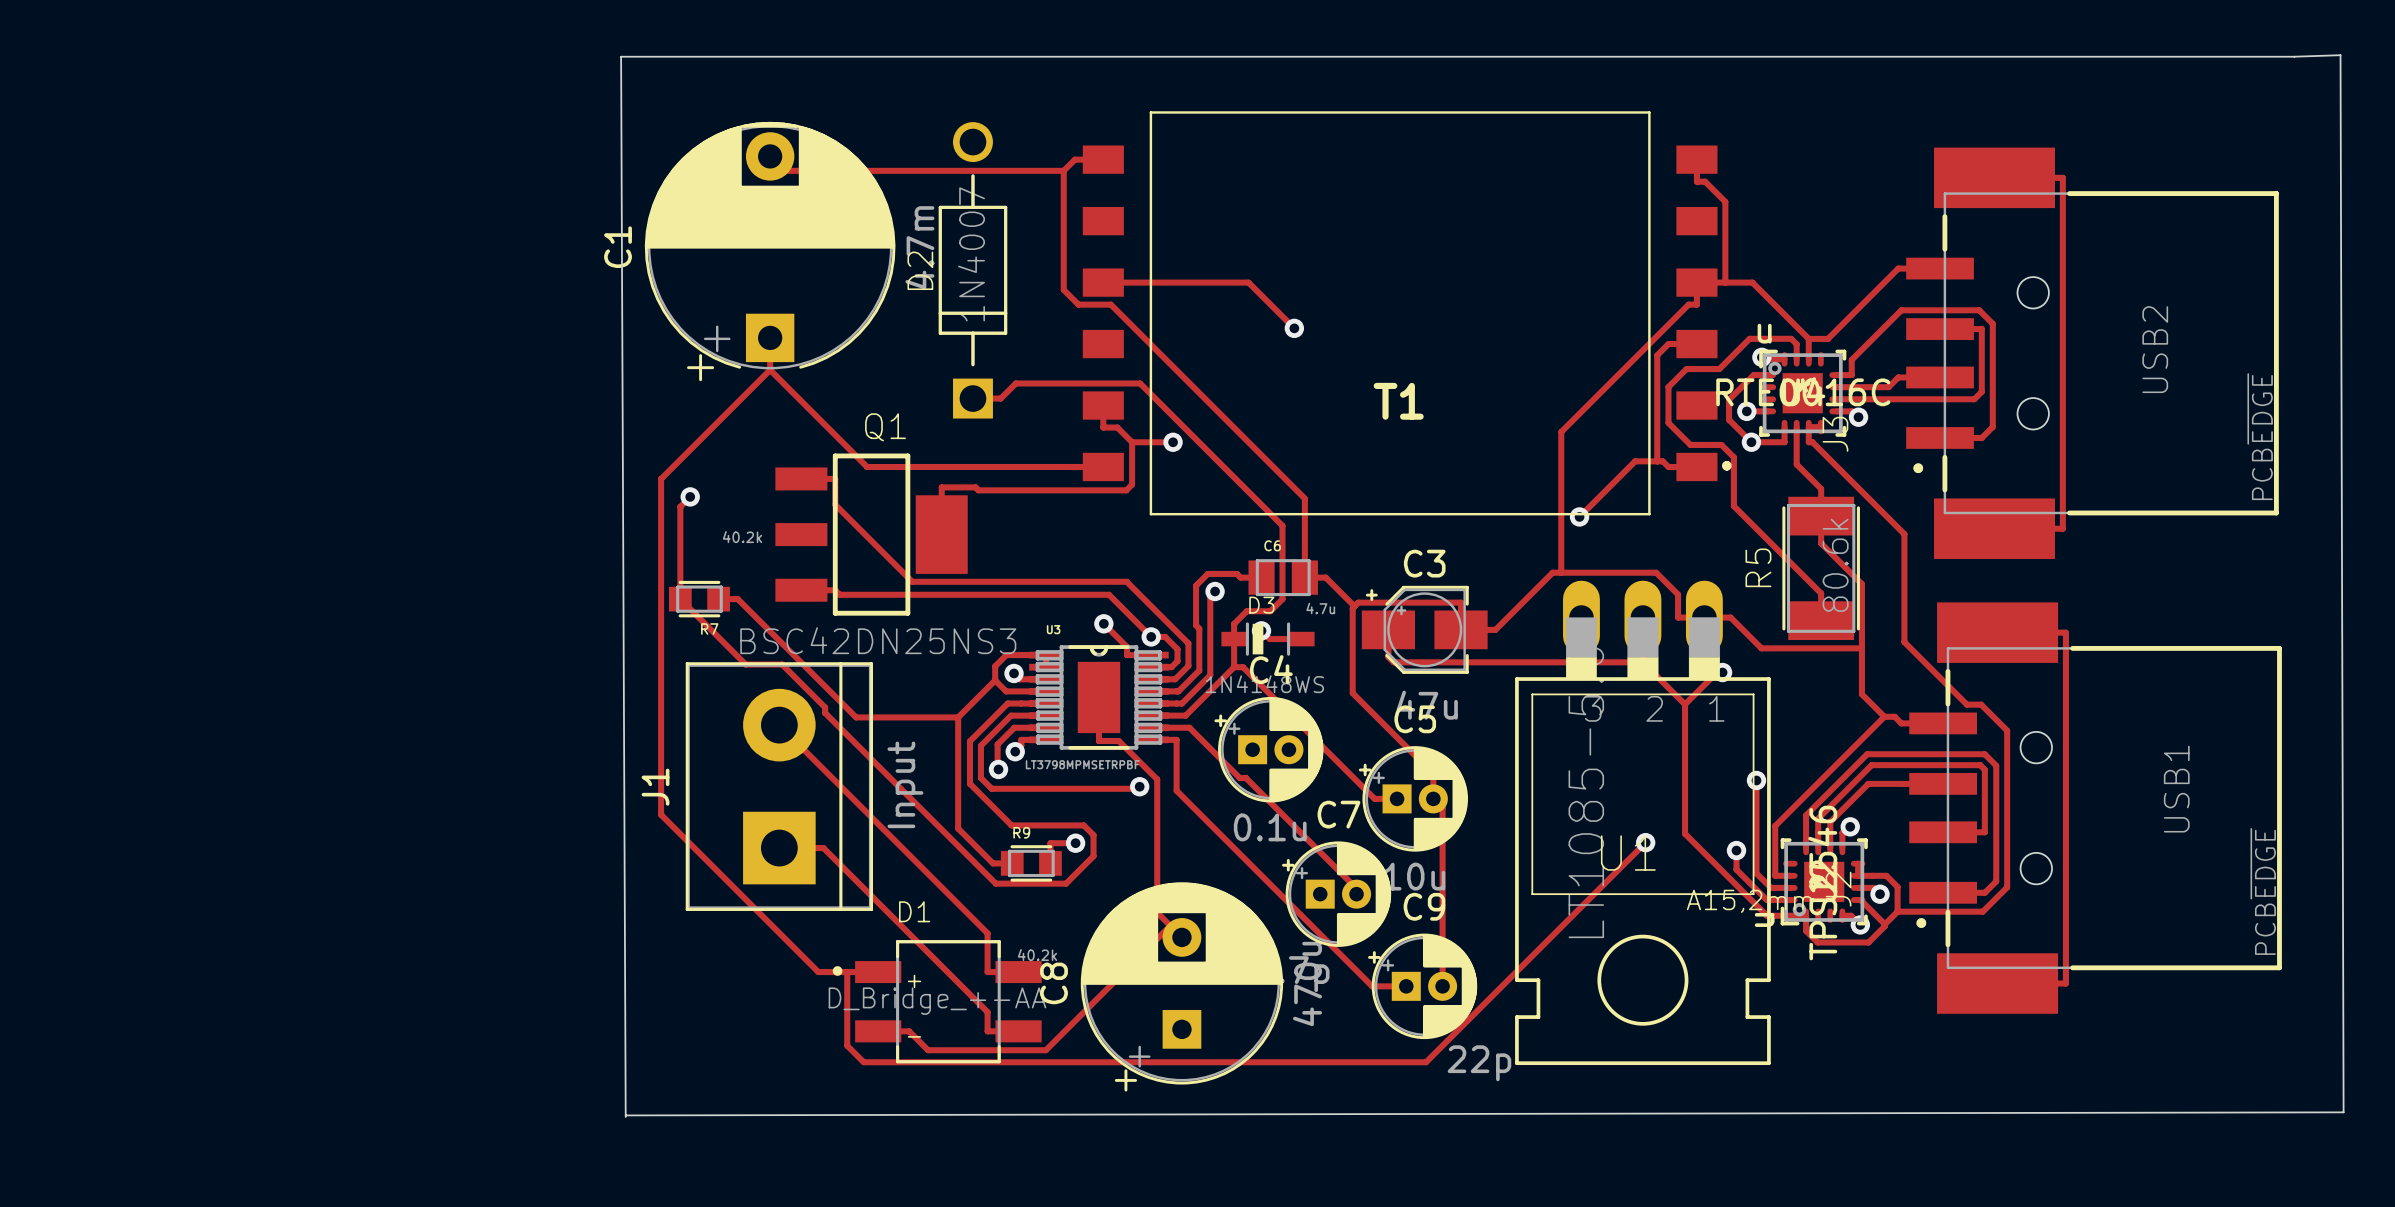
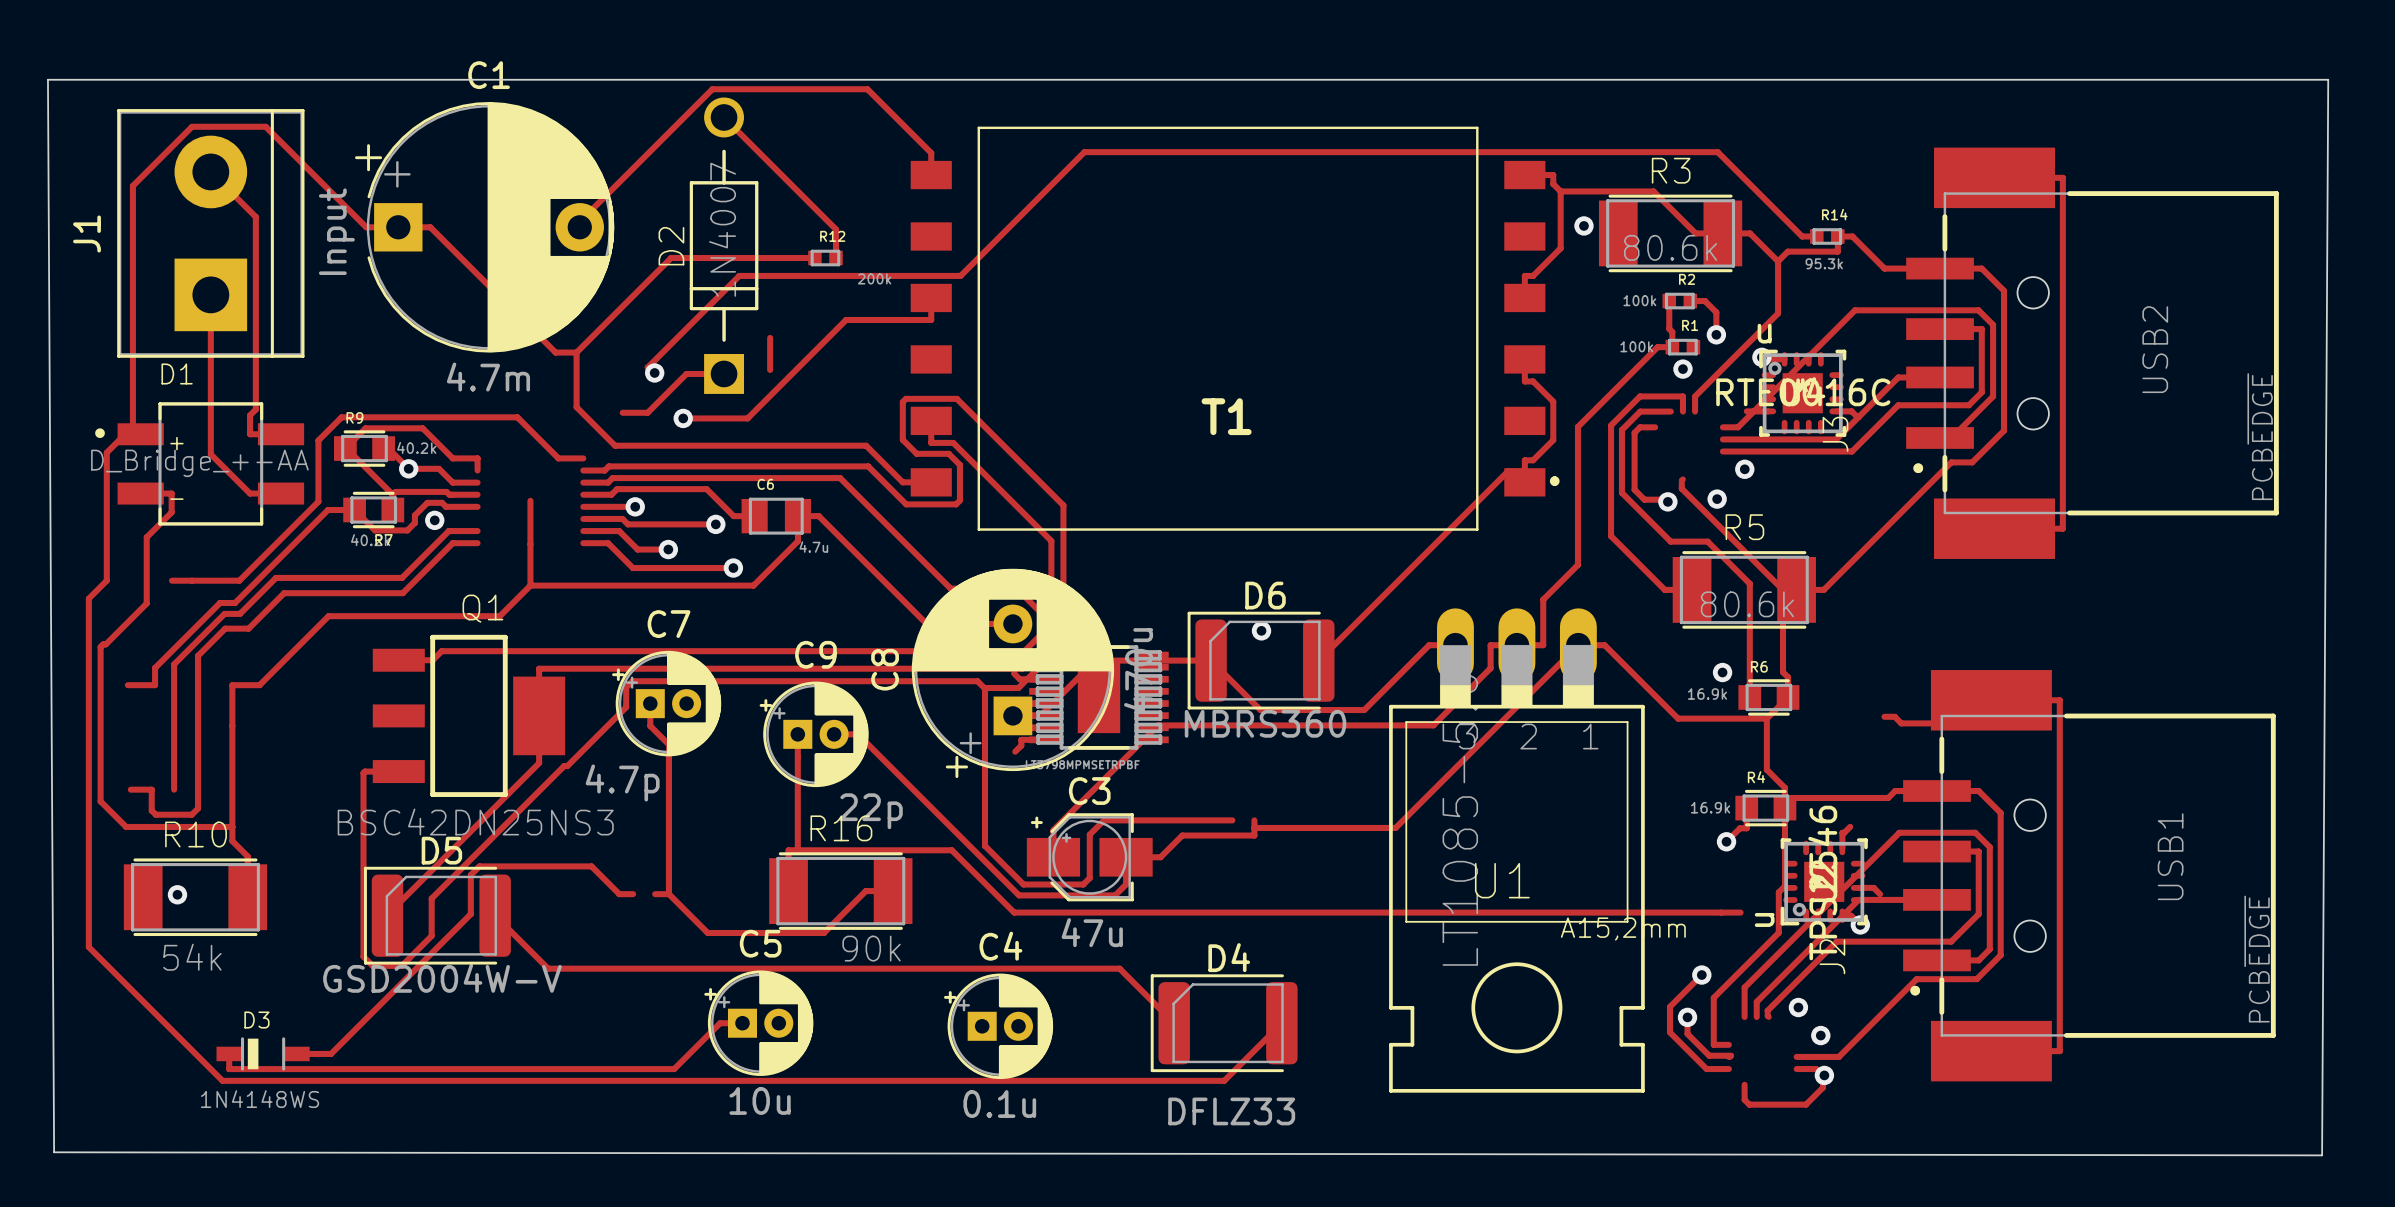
board edge: none -> (47, 79) (54, 1152) (2322, 1155) (2328, 79) (47, 79)
track: none -> (724, 117) (835, 229) (835, 258)
track: (770, 156) (784, 170) (1063, 170) -> none
track: (1103, 159) (1074, 159) (1063, 170) -> none
track: (1696, 159) (1696, 181) (1705, 181) (1725, 201) (1725, 282) -> none
track: (1063, 170) (1063, 289) (1078, 304) (1110, 304) (1304, 498) (1304, 577) (1325, 577) (1354, 606) -> none
track: none -> (210, 171) (255, 216) (255, 409) (250, 415) (250, 434) (281, 434)
track: none -> (931, 175) (931, 153) (867, 89) (712, 89) (579, 221) (579, 227)
track: none -> (1524, 175) (1553, 175) (1553, 184) (1560, 191)
track: none -> (1560, 191) (1560, 248) (1533, 275) (1524, 275) (1524, 297)
track: none -> (1560, 191) (1653, 191) (1695, 233) (1750, 233) (1778, 261)
via: none -> (1583, 225)
R3: none -> 80.6k (1670, 233)
track: none -> (1816, 236) (1802, 236) (1717, 152) (1084, 152) (960, 275) (739, 275) (647, 367) (654, 372)
R14: none -> 95.3k (1827, 236)
C1 rotation: 0° (770, 251) -> 90° clockwise (484, 227)
C1 position: (770, 251) -> (484, 227)
track: none -> (814, 258) (671, 258) (576, 352)
R12: none -> 200k (825, 258)
track: none -> (1778, 261) (1778, 313) (1695, 396) (1695, 411)
track: (1898, 268) (1827, 338) (1808, 338) -> (1898, 268) (1884, 268) (1852, 236) (1837, 236) (1837, 251) (1787, 251) (1778, 261)
track: none -> (1940, 268) (1981, 268) (2003, 290) (2003, 430) (1972, 462) (1951, 462) (1823, 589) (1782, 589)
D2 position: (972, 270) -> (724, 245)
track: (1103, 282) (1248, 282) (1294, 328) -> none
track: none -> (210, 294) (210, 454) (250, 493) (281, 493)
track: none -> (931, 297) (931, 319) (846, 319) (747, 418) (683, 418)
track: none -> (1669, 301) (1669, 328) (1672, 332) (1672, 347) (1657, 347) (1577, 426) (1577, 564) (1543, 599) (1543, 645) (1490, 645) (1490, 668) (1433, 725) (1158, 725) (1053, 830) (1053, 857)
R2: none -> 100k (1679, 301)
track: none -> (1690, 301) (1704, 301) (1716, 312) (1716, 334)
track: (1901, 310) (1851, 359) (1851, 375) (1836, 375) -> (1901, 310) (1855, 310) (1738, 427) (1722, 427)
track: (1978, 310) (1992, 323) (1992, 426) (1981, 437) (1951, 437) -> (1978, 310) (1993, 324) (1993, 396) (1951, 437)
T1 position: (1407, 313) -> (1235, 328)
via: (1294, 328) -> none
via: none -> (1716, 334)
track: (1808, 338) (1752, 282) (1696, 282) (1696, 304) (1688, 304) (1561, 432) (1561, 572) -> none
track: (1808, 338) (1808, 359) -> none
track: (1696, 344) (1668, 344) (1657, 355) (1657, 461) -> none
R1: none -> 100k (1682, 347)
track: none -> (576, 352) (576, 407) (615, 445) (866, 445) (902, 482) (931, 482)
track: none -> (576, 352) (555, 352) (430, 227) (366, 227) (265, 126) (192, 126) (132, 185) (132, 434)
track: none -> (1524, 359) (1524, 381) (1533, 381) (1553, 401) (1553, 440) (1533, 460) (1524, 460) (1524, 482)
track: (1796, 359) (1796, 344) (1791, 338) (1749, 338) (1719, 369) (1686, 369) (1668, 387) (1668, 422) (1690, 444) (1721, 444) (1733, 457) (1733, 506) (1821, 593) (1821, 620) -> none
via: none -> (1682, 369)
via: none -> (654, 372)
track: none -> (724, 373) (686, 373) (647, 412) (622, 412)
track: (1768, 375) (1753, 375) (1729, 399) (1729, 419) (1751, 442) (1784, 442) (1784, 427) -> none
track: (1836, 387) (1888, 387) -> (1722, 439) (1836, 439) (1888, 387)
track: (1981, 391) (1974, 399) (1836, 399) -> (1981, 391) (1968, 405) (1898, 405) (1852, 451) (1722, 451)
track: (972, 398) (1000, 398) (1015, 383) (1140, 383) (1282, 525) (1282, 599) (1270, 611) (1246, 611) (1234, 623) (1234, 667) -> none
track: (1103, 405) (1103, 427) (1117, 427) (1132, 442) -> none
track: none -> (1670, 411) (1640, 411) (1621, 429) (1621, 492) (1670, 541) (1707, 541) (1749, 583) (1749, 697)
track: none -> (1682, 411) (1682, 396) (1640, 396) (1611, 425) (1611, 536) (1664, 589) (1692, 589)
via: (1746, 411) -> none
via: (1858, 417) -> none
via: none -> (683, 418)
track: none -> (931, 420) (931, 442) (953, 442) (1051, 540) (1051, 639) (1022, 668) (539, 668) (539, 763) (387, 915)
track: none -> (1655, 427) (1640, 427) (1634, 432) (1634, 489) (1644, 499) (1665, 499) (1667, 501)
track: (1796, 427) (1796, 464) (1821, 488) (1821, 543) (1861, 584) (1861, 694) (1884, 716) (1775, 826) (1775, 875) (1790, 875) -> none
track: (1820, 427) (1808, 427) (1808, 442) (1812, 442) (1904, 534) (1904, 642) (1966, 704) (1981, 704) (2007, 730) (2007, 887) (1982, 911) (1897, 911) -> none
track: none -> (140, 434) (125, 434) (106, 452) (106, 580) (88, 598) (88, 947) (222, 1080) (1224, 1080) (1281, 1023)
track: (1132, 442) (1173, 442) -> none
track: (1132, 442) (1132, 484) (1126, 490) (978, 490) (975, 487) (941, 487) (941, 534) -> none
via: (1173, 442) -> none
via position: (1751, 442) -> (1744, 469)
track: none -> (383, 448) (388, 448) (408, 468) (439, 468) (452, 482) (477, 482)
track: none -> (583, 458) (558, 458) (517, 417) (341, 417) (318, 440) (318, 501) (239, 580) (172, 580)
track: (1103, 466) (867, 466) (770, 369) (661, 479) (661, 814) (818, 972) (878, 972) -> none
track: (1696, 466) (1668, 466) (1662, 461) (1635, 461) (1579, 516) -> none
via: none -> (408, 468)
track: none -> (477, 470) (477, 458) (452, 458) (422, 428) (365, 428) (345, 448) (392, 494)
track: none -> (583, 470) (604, 470) (608, 466) (868, 466) (906, 504) (956, 504) (959, 500) (959, 464) (948, 453) (916, 453) (902, 439) (902, 401) (905, 398) (956, 398) (1063, 505) (1063, 643) (1018, 688) (985, 688)
track: none -> (1524, 471) (1508, 471) (1318, 660)
track: (801, 478) (835, 478) (835, 504) (912, 581) (1126, 581) (1188, 643) (1188, 666) (1175, 679) (1151, 679) -> none
track: none -> (1682, 479) (1681, 488) (1782, 589)
track: none -> (583, 482) (608, 482) (612, 478) (840, 478) (950, 588) (1016, 588) (1040, 612) (1040, 635) (1024, 651) (441, 651) (432, 660) (398, 660)
track: none -> (140, 493) (171, 493) (171, 512) (146, 537) (146, 603) (105, 644) (100, 646) (100, 801) (126, 826) (232, 826)
track: none -> (392, 494) (395, 491) (446, 491) (449, 494) (477, 494)
track: none -> (583, 494) (611, 494) (617, 489) (706, 489) (733, 516) (754, 516)
track: (690, 496) (680, 506) (680, 599) (745, 664) (782, 664) (825, 707) (825, 713) (995, 883) (1066, 883) (1093, 856) (1093, 835) (1083, 825) (1011, 825) (969, 783) (969, 741) (1007, 703) (1046, 703) -> none
via: (690, 496) -> none
via: none -> (1717, 499)
track: none -> (530, 500) (530, 585)
via: none -> (1667, 501)
track: none -> (477, 506) (446, 506) (442, 502) (427, 502) (414, 515) (414, 522) (407, 530) (375, 530) (354, 510) (328, 510) (235, 603) (220, 603) (155, 668) (155, 685) (127, 685)
track: none -> (583, 506) (635, 506)
via: none -> (635, 506)
via: (1579, 516) -> none
track: none -> (583, 518) (622, 518) (627, 524) (715, 524)
via: none -> (434, 520)
via: none -> (715, 524)
track: none -> (477, 531) (448, 531) (402, 577) (275, 577) (240, 613) (224, 613) (174, 664) (174, 789)
track: none -> (583, 531) (619, 531) (637, 549) (668, 549)
Q1 position: (871, 534) -> (468, 715)
track: none -> (477, 543) (452, 543) (402, 593) (284, 593) (248, 628) (225, 628) (198, 655) (198, 808) (191, 814) (155, 814) (151, 810) (151, 789) (130, 789)
track: none -> (583, 543) (608, 543) (632, 568) (733, 568)
via: none -> (668, 549)
via: none -> (733, 568)
R5 rotation: 0° (1821, 568) -> 90° clockwise (1744, 589)
track: (1261, 577) (1240, 577) (1236, 573) (1207, 573) (1196, 585) (1196, 625) (1199, 628) (1199, 670) (1178, 691) (1151, 691) -> none
C6 position: (1283, 577) -> (776, 516)
U1 footprint: [1515, 580, 1771, 1066] -> [1389, 608, 1645, 1093]
track: none -> (530, 585) (499, 616) (328, 616) (259, 685) (232, 685) (232, 841) (247, 856) (247, 897)
track: none -> (530, 585) (753, 585) (797, 541) (797, 516) (818, 516) (926, 623) (1012, 623)
track: none -> (1782, 589) (1782, 672) (1788, 677) (1788, 697) (1766, 718)
track: (801, 590) (835, 590) (839, 594) (1109, 594) (1151, 636) (1165, 636) (1177, 649) (1177, 661) (1171, 667) (1151, 667) -> none
track: (1215, 591) (1210, 596) (1210, 675) (1182, 703) (1151, 703) -> none
via: (1215, 591) -> none
R7 position: (699, 599) -> (373, 510)
track: (718, 599) (737, 599) (856, 717) (958, 717) -> none
track: (1103, 623) (1127, 647) (1127, 655) (1151, 655) -> none
via: (1103, 623) -> none
track: (1388, 629) (1388, 657) (1393, 662) (1642, 662) -> none
C3 position: (1424, 629) -> (1089, 857)
track: (1261, 630) (1269, 639) (1301, 639) -> none
track: (1997, 632) (2065, 632) (2065, 983) (1997, 983) -> (1991, 700) (2059, 700) (2059, 1051) (1991, 1051)
via: (1151, 636) -> none
D3 position: (1268, 639) -> (263, 1053)
track: none -> (1455, 645) (1429, 645) (1364, 710) (1260, 710) (1211, 660) (1095, 660) (1040, 715) (1012, 715)
track: (1861, 648) (1761, 648) (1730, 617) (1678, 617) (1678, 594) (1656, 572) (1552, 572) (1495, 629) (1461, 629) (1461, 602) (1358, 602) (1352, 608) (1352, 693) (1433, 773) (1433, 798) (1442, 808) (1442, 986) -> none
D6: none -> MBRS360 (1261, 660)
track: (1642, 662) (1685, 704) -> none
track: (1046, 667) (1046, 655) (1006, 655) (995, 666) (995, 680) -> none
track: (1234, 667) (1243, 667) (1374, 798) (1397, 798) -> none
track: (1234, 667) (1185, 715) (1151, 715) -> none
track: (1722, 672) (1716, 672) (1685, 704) -> none
via: (1014, 673) -> none
track: (995, 680) (958, 717) -> none
track: (995, 680) (1006, 691) (1046, 691) -> none
track: none -> (985, 688) (977, 681) (632, 681) (626, 687) (626, 707) (567, 766) (564, 766) (431, 898) (431, 935) (401, 965) (372, 965) (363, 956) (363, 772) (398, 771)
track: none -> (985, 688) (985, 845) (1023, 884) (1083, 884) (1089, 878) (1089, 834) (1104, 820) (1232, 820)
track: (1098, 697) (1098, 740) (1118, 740) (1157, 779) (1157, 912) (1181, 937) -> none
R6: none -> 16.9k (1768, 697)
track: none -> (650, 703) (650, 726) (668, 744) (668, 894)
track: (1685, 704) (1685, 833) (1766, 915) (1806, 915) (1806, 930) (1817, 942) (1868, 942) (1884, 924) -> none
track: (1046, 715) (1011, 715) (980, 745) (980, 778) (991, 788) (1137, 788) (1139, 786) -> none
track: (958, 717) (958, 828) (993, 863) (1012, 863) -> none
track: none -> (1766, 718) (1766, 769) (1784, 787) (1784, 886) (1778, 892) (1778, 932) (1713, 997) (1713, 1044) (1728, 1044)
track: none -> (1766, 718) (1678, 718) (1604, 645) (1578, 645) (1395, 827) (1254, 827)
track: (779, 725) (987, 933) (987, 972) (1018, 972) -> none
track: (1046, 727) (1014, 727) (997, 744) (998, 769) -> none
track: (1151, 727) (1189, 727) (1239, 778) (1246, 778) (1356, 888) (1356, 894) -> none
track: none -> (797, 734) (797, 850)
track: none -> (834, 734) (858, 734) (1019, 895) (1115, 895) (1126, 884) (1126, 857) (1160, 857) (1182, 835) (1254, 835) (1254, 820)
track: (1151, 739) (1176, 739) (1176, 790) (1372, 986) (1406, 986) -> none
C4 position: (1268, 749) -> (998, 1026)
via: (1015, 751) -> none
via: (998, 769) -> none
track: (1756, 780) (1756, 873) (1770, 887) (1790, 887) -> none
via: (1756, 780) -> none
track: (1943, 783) (1868, 783) (1830, 821) (1830, 847) -> none
J1 position: (779, 786) -> (210, 233)
via: (1139, 786) -> none
track: none -> (1784, 797) (1888, 797) (1895, 791) (1978, 791) (2000, 812) (2000, 955) (1976, 979) (1916, 979) (1838, 1056) (1796, 1056)
C5 position: (1413, 798) -> (758, 1023)
track: none -> (1746, 808) (1746, 828) (1739, 828) (1726, 841)
R4: none -> 16.9k (1765, 808)
J2 position: (2095, 808) -> (2089, 875)
via: (1850, 826) -> none
track: (1943, 832) (1984, 832) (1984, 769) (1980, 765) (1871, 765) (1818, 818) (1818, 847) -> none
track: (1645, 842) (1426, 1062) (863, 1062) (847, 1045) (847, 972) -> none
via: (1645, 842) -> none
track: (1075, 843) (1050, 843) (1050, 863) -> none
via: (1075, 843) -> none
track: (1806, 847) (1806, 815) (1867, 754) (1984, 754) (1996, 765) (1996, 881) (1984, 892) (1943, 892) -> none
track: (779, 848) (823, 848) (987, 1012) (987, 1031) (1018, 1031) -> none
track: (1736, 850) (1736, 869) (1766, 900) (1790, 900) -> none
via position: (1736, 850) -> (1726, 841)
track: none -> (1936, 851) (1978, 851) (1978, 914) (1951, 941) (1836, 941) (1767, 1010) (1768, 1017)
R9 position: (1031, 863) -> (364, 448)
track: (1858, 863) (1858, 875) (1886, 875) (1897, 886) (1897, 911) -> none
track: none -> (788, 891) (788, 850) (951, 850) (1014, 912) (1740, 912)
R16: none -> 90k (840, 891)
track: none -> (893, 891) (865, 891) (823, 932) (707, 932) (668, 894)
via: none -> (177, 894)
track: none -> (633, 894) (619, 894) (591, 866) (479, 866) (470, 875) (470, 914) (331, 1053) (296, 1053)
track: none -> (655, 894) (668, 894)
C7 position: (1336, 894) -> (666, 703)
via: (1880, 894) -> none
R10: none -> 54k (195, 897)
track: none -> (1936, 899) (1858, 899) (1756, 1001) (1756, 1017)
track: (1858, 900) (1860, 900) (1884, 924) -> none
track: (1897, 911) (1884, 924) -> none
D5: none -> GSD2004W-V (437, 915)
track: none -> (495, 915) (548, 968) (1119, 968) (1174, 1023)
track: (1170, 925) (1045, 1050) (928, 1050) (909, 1031) (878, 1031) -> none
track: none -> (1936, 960) (1978, 960) (1989, 949) (1989, 847) (1975, 832) (1899, 832) (1744, 987) (1744, 1017)
track: none -> (1701, 975) (1669, 1006) (1669, 1032) (1706, 1069) (1728, 1069)
via: none -> (1701, 975)
C8 position: (1181, 986) -> (1012, 673)
C9 position: (1422, 986) -> (814, 734)
D1 position: (937, 1001) -> (199, 463)
via: none -> (1798, 1007)
track: none -> (1687, 1017) (1687, 1034) (1709, 1055) (1731, 1055) (1728, 1056)
via: none -> (1687, 1017)
track: none -> (742, 1023) (720, 1023) (674, 1069) (229, 1069) (229, 1053)
D4: none -> DFLZ33 (1224, 1023)
via: none -> (1820, 1035)
track: none -> (1796, 1069) (1816, 1069) (1823, 1075)
track: none -> (1823, 1075) (1823, 1087) (1806, 1104) (1749, 1104) (1744, 1099) (1744, 1084)
via: none -> (1824, 1075)
board edge: (625, 1115) (2343, 1112) (2340, 55) (621, 56) (625, 1116) -> none

